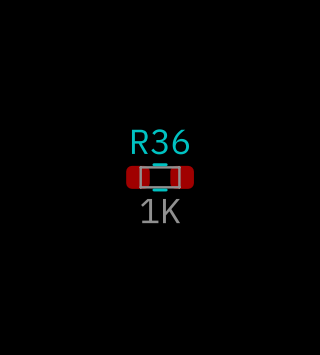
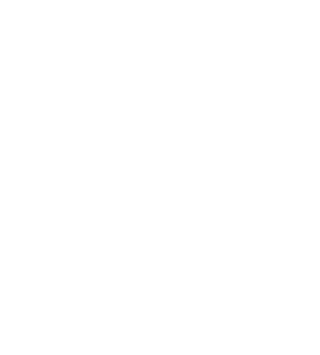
R36: 1K (160, 177) -> none

